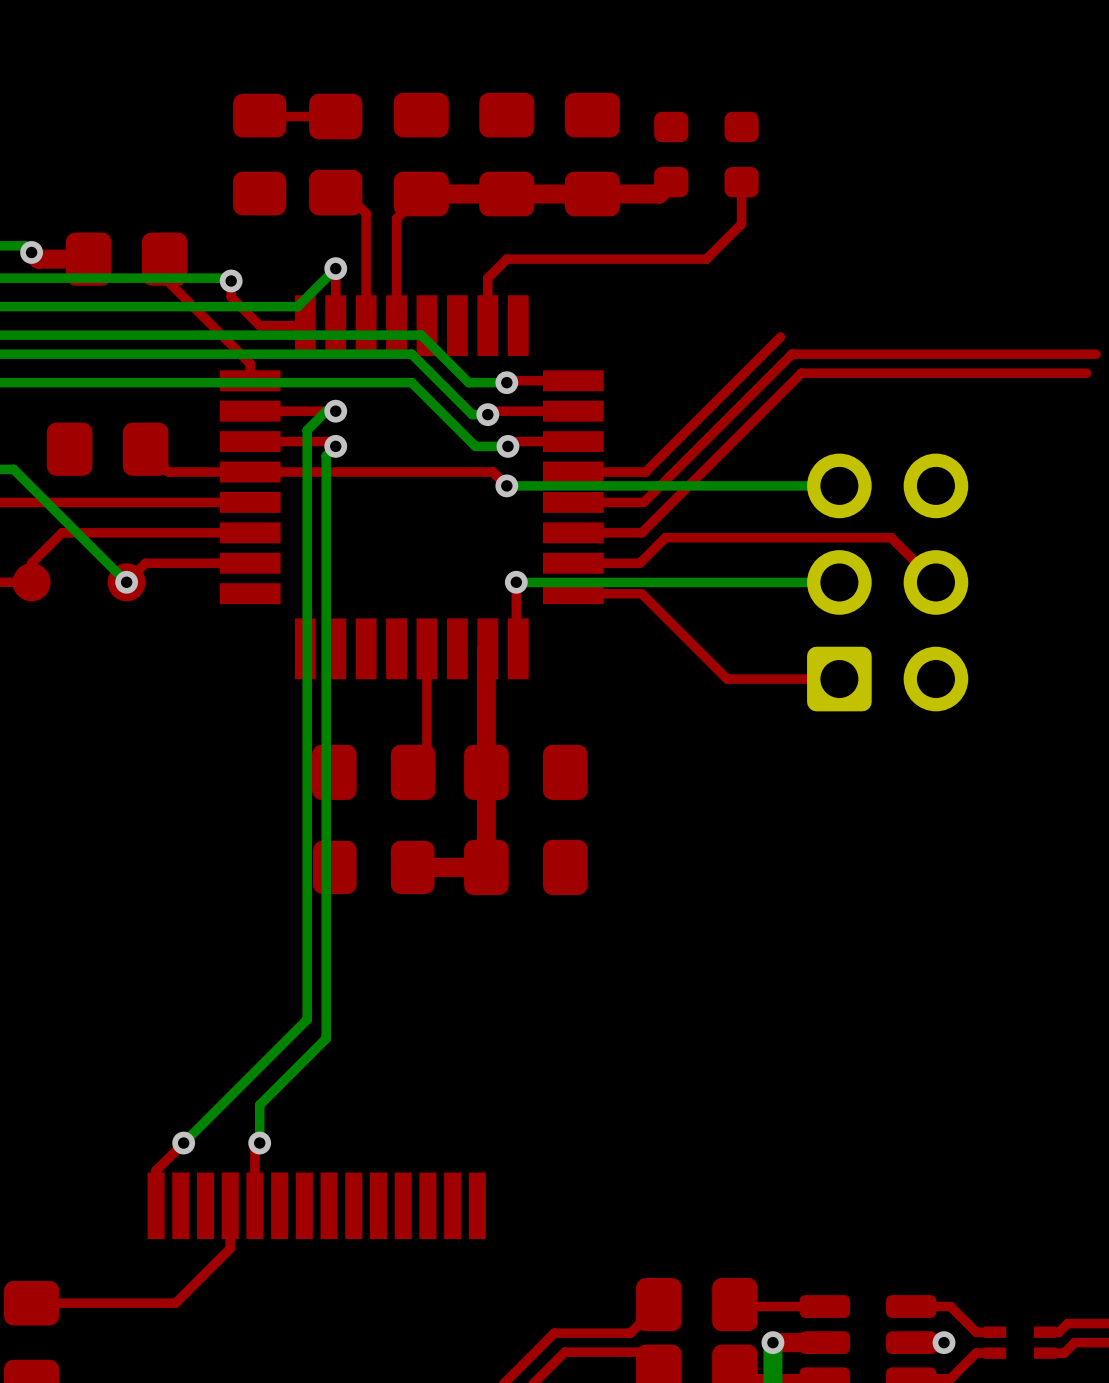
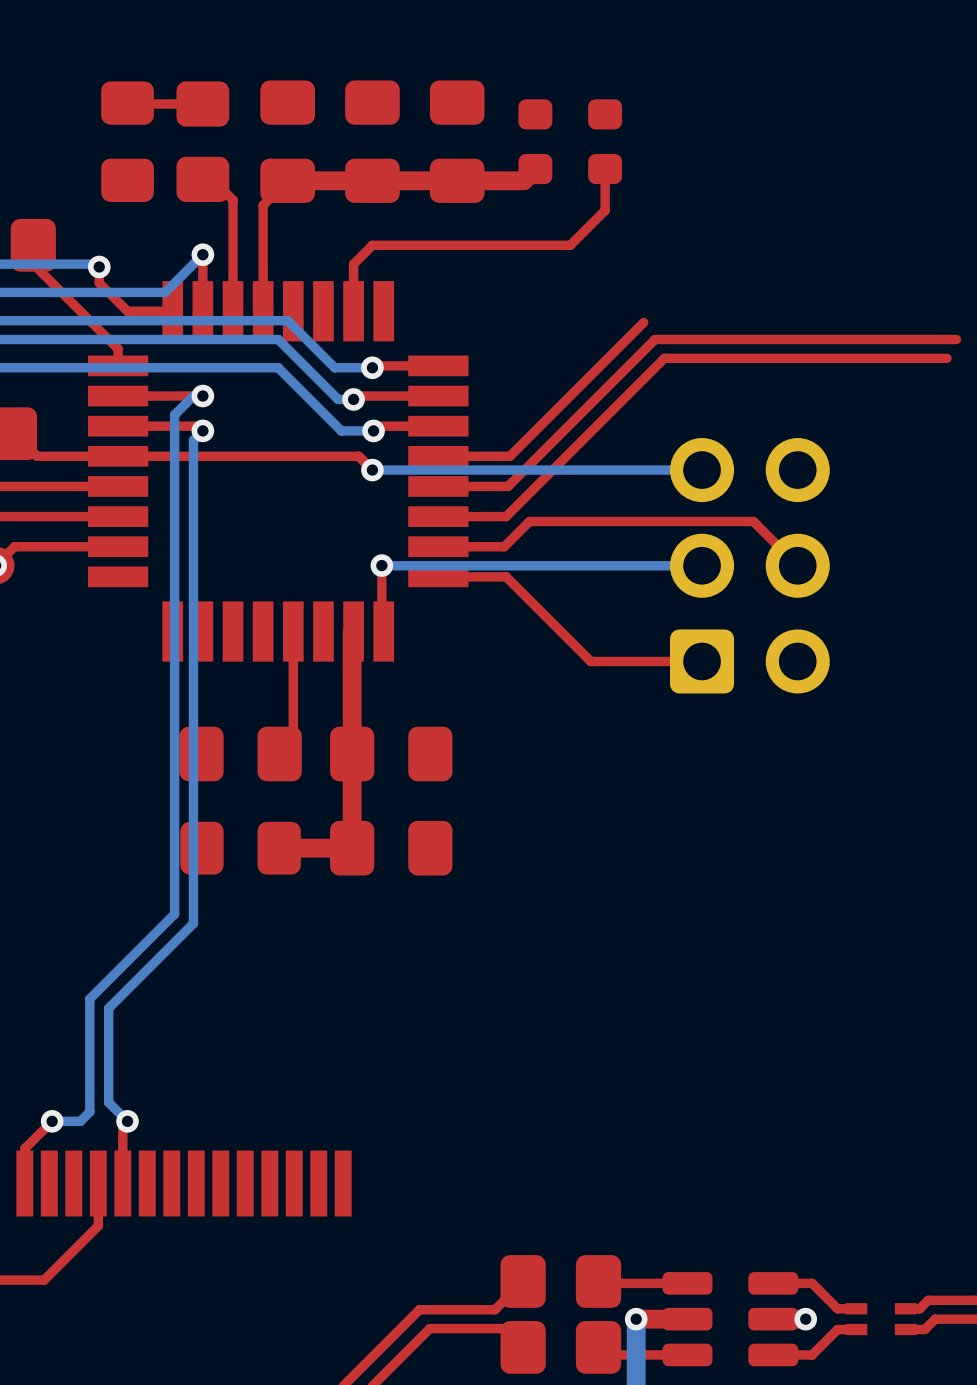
bottom track: (307, 933) (307, 1019) (183, 1143) -> (174, 914) (89, 998) (89, 1111) (80, 1121) (52, 1121)
bottom track: (326, 943) (326, 1038) (259, 1105) (259, 1143) -> (193, 923) (108, 1008) (108, 1102) (127, 1121)

